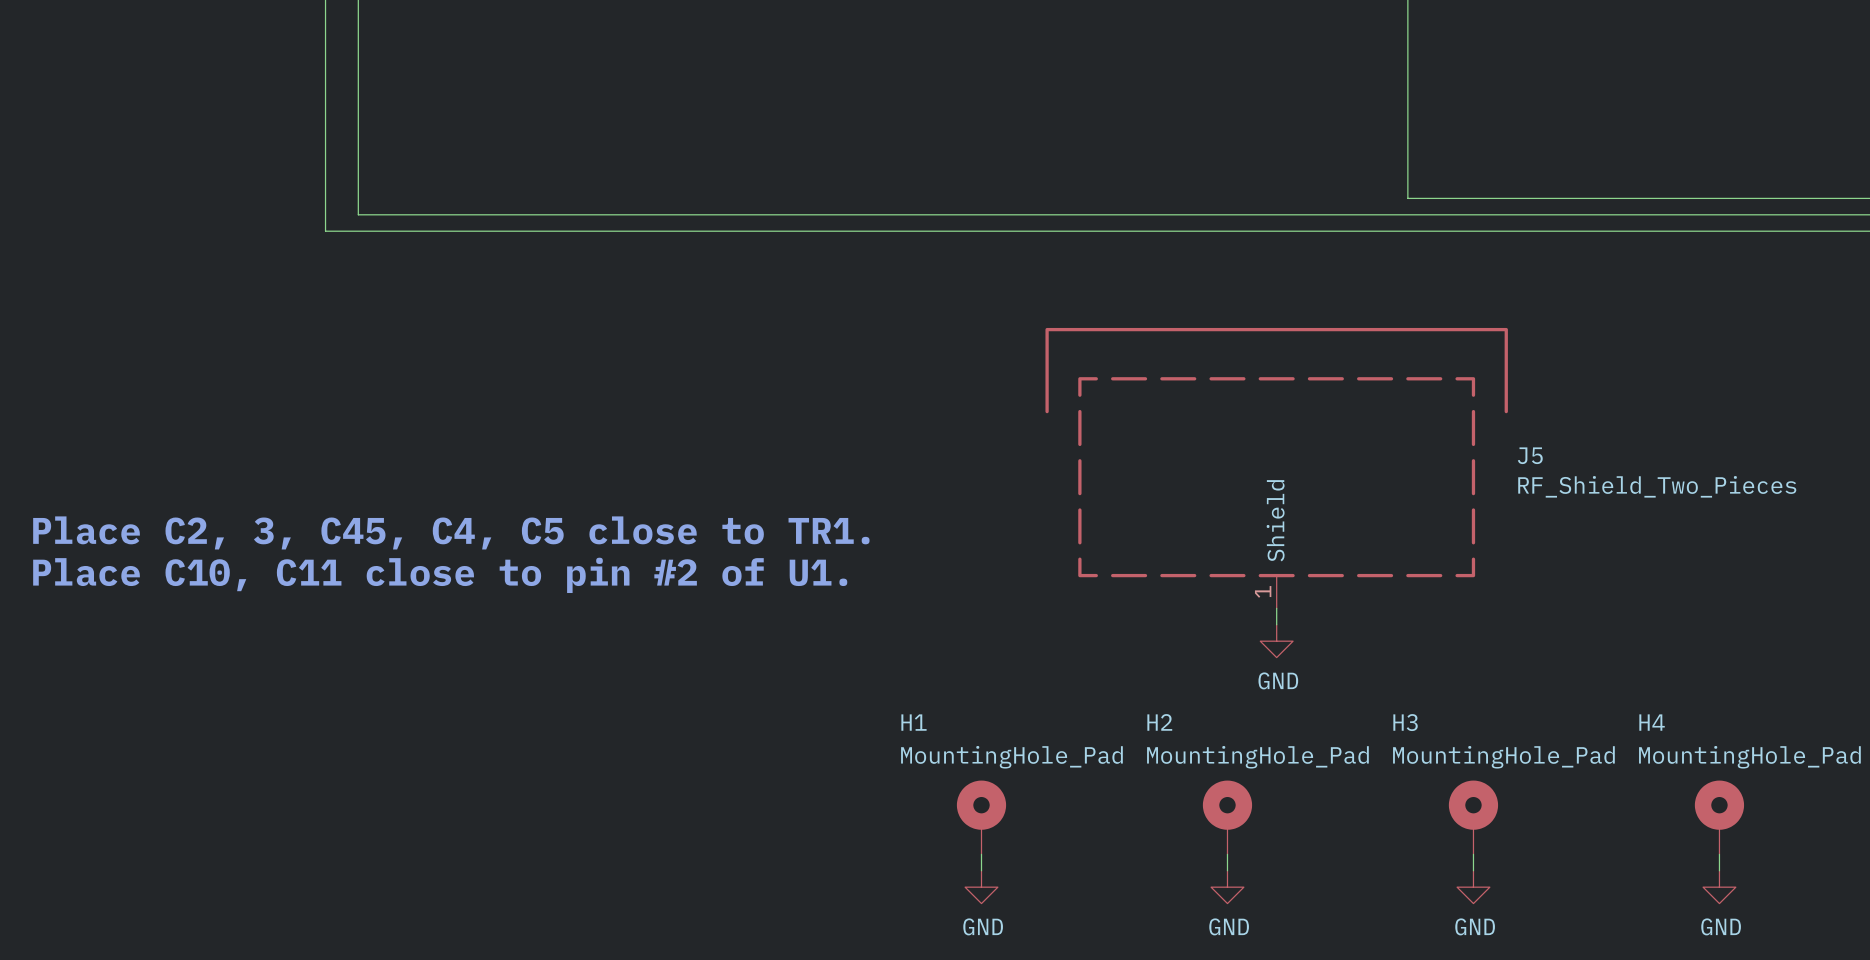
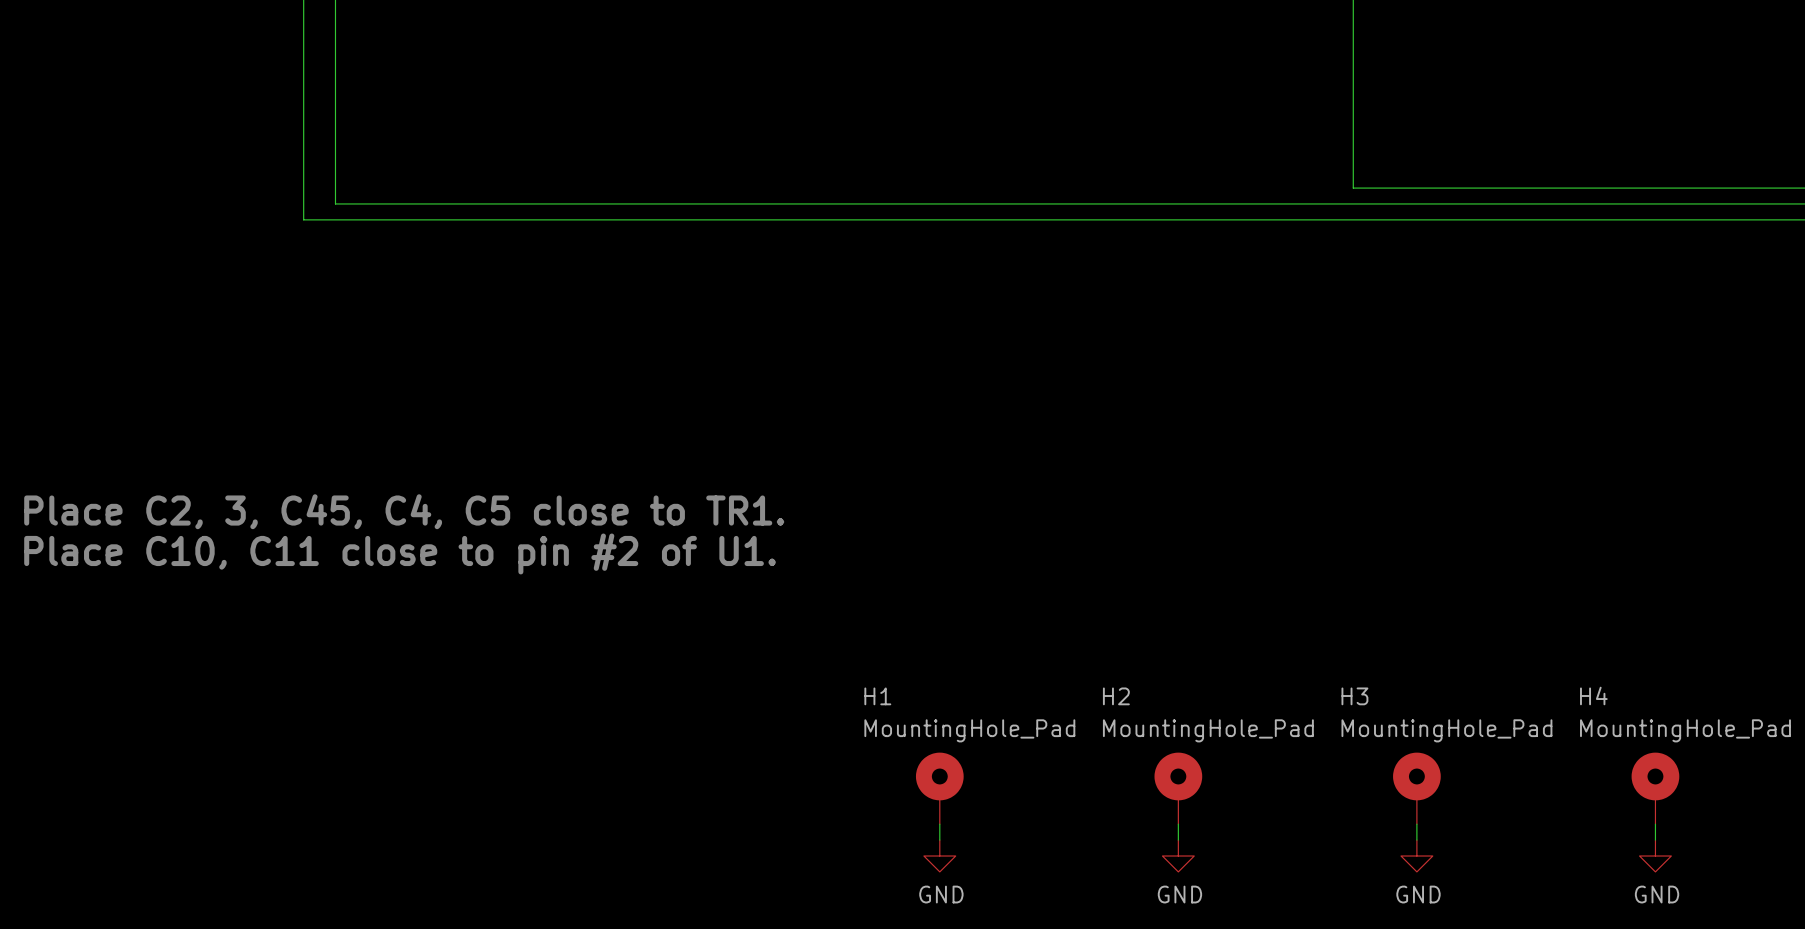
J5: RF_Shield_Two_Pieces (1276, 468) -> none
wire: (1276, 608) (1276, 624) -> none
power symbol: GND (1276, 641) -> none

